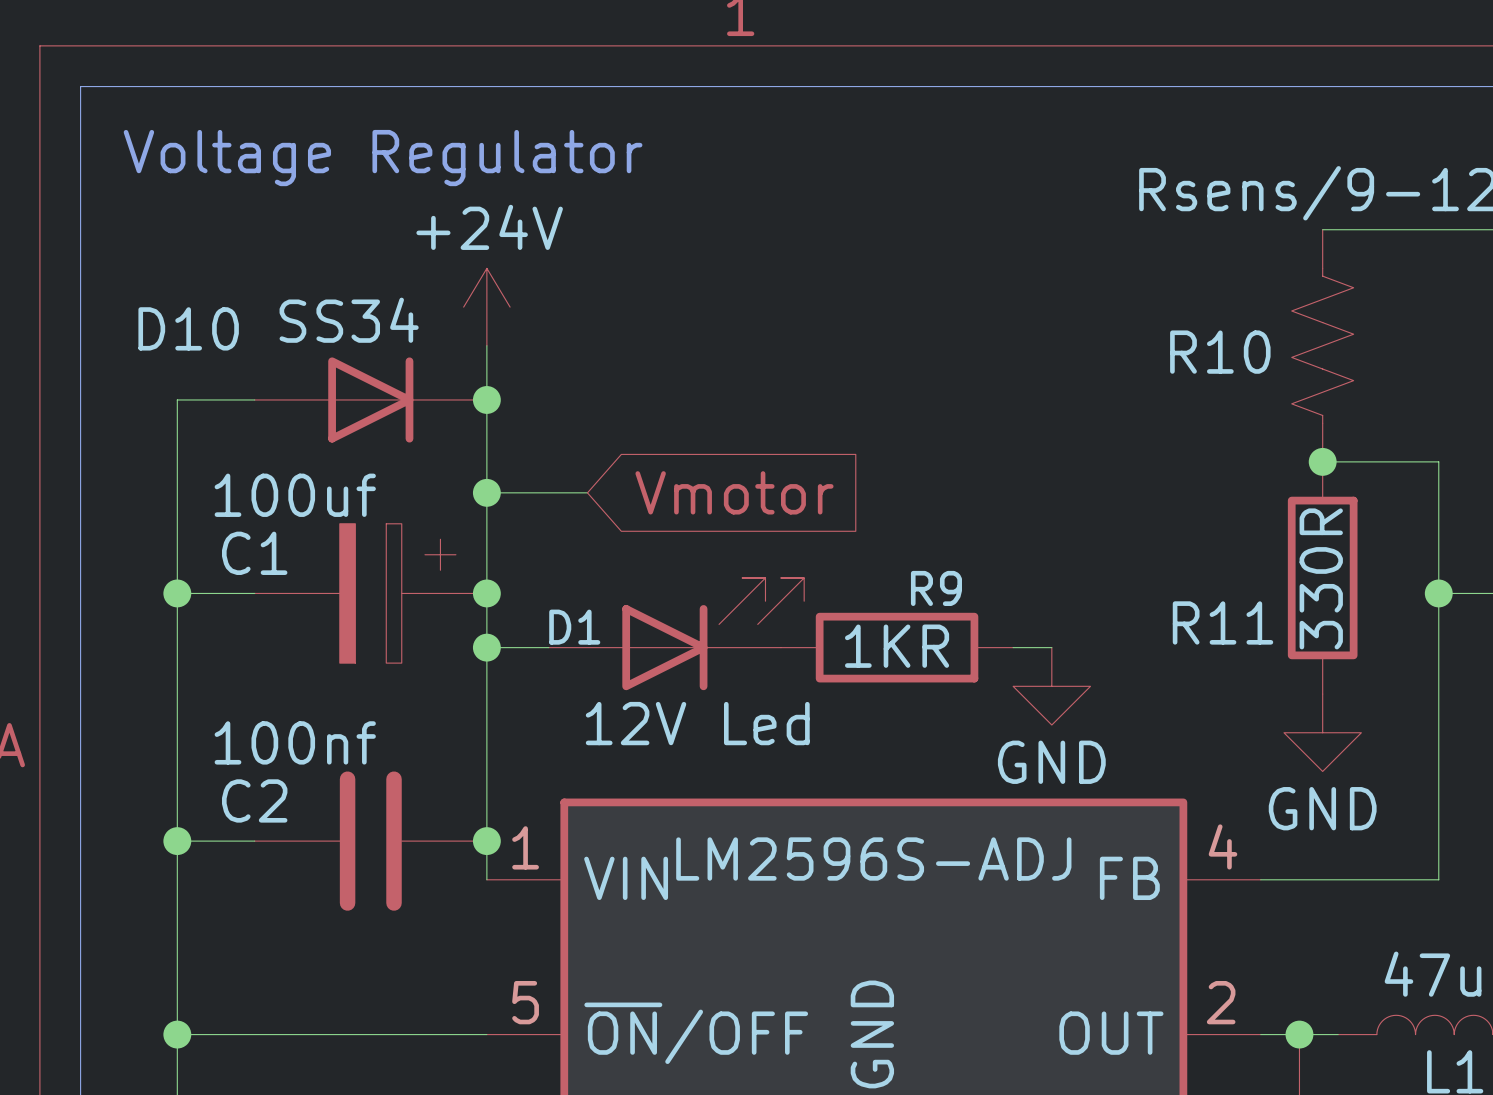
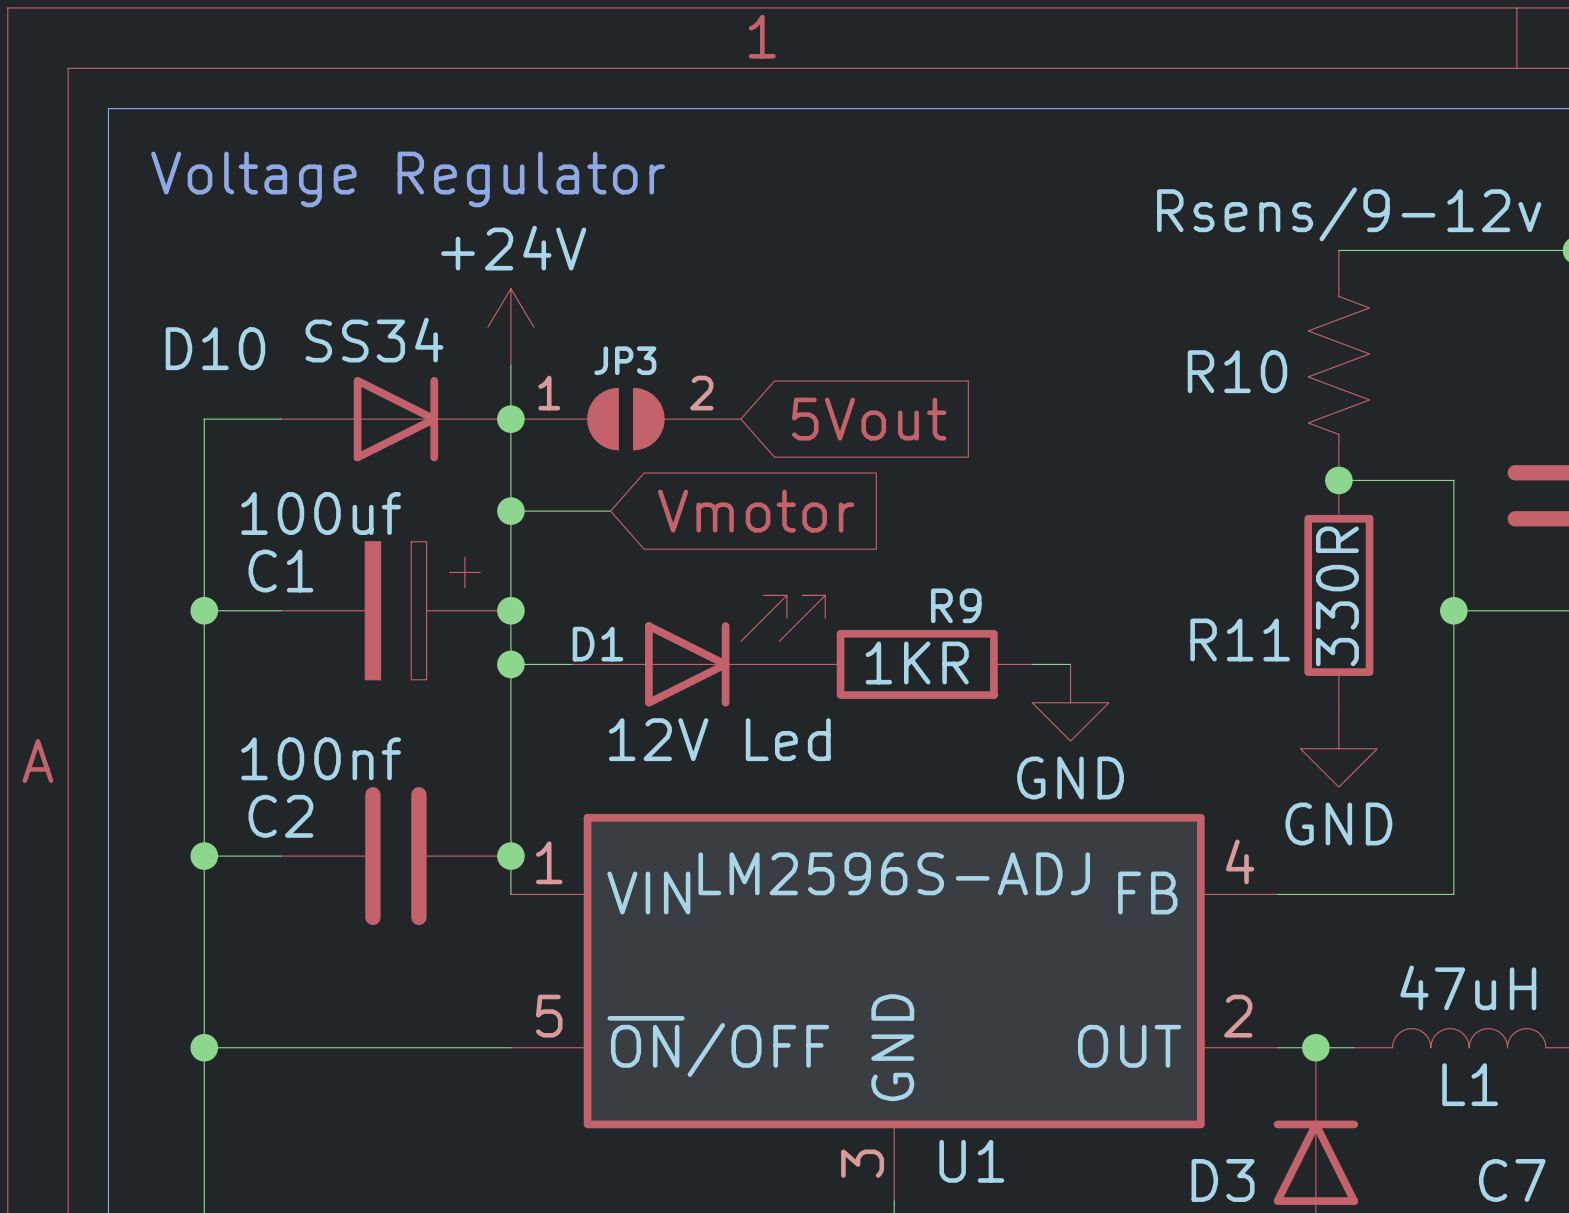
JP3: none -> (625, 419)
global label: none -> 5Vout (869, 419)

